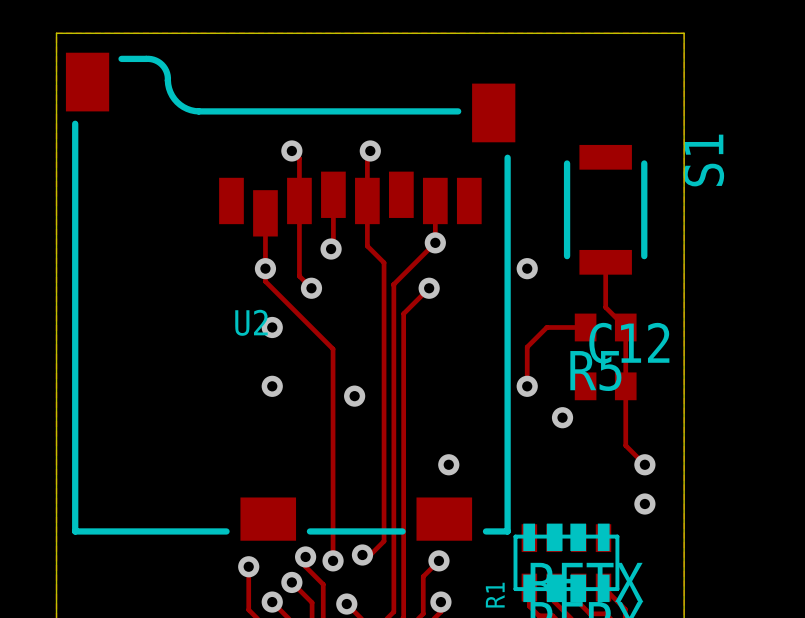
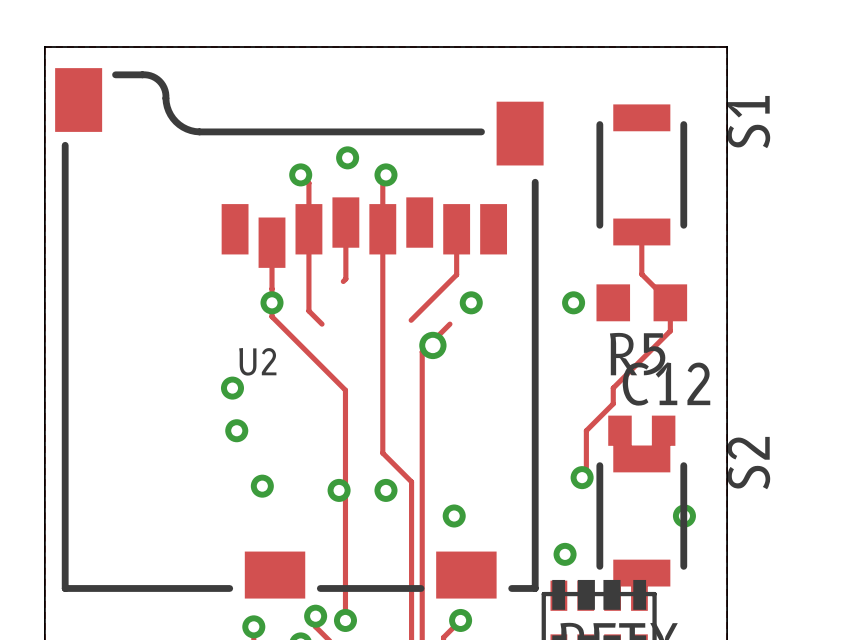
via: none -> (347, 157)
track: none -> (641, 231) (641, 274) (670, 302) (670, 331) (613, 388) (613, 403) (586, 430) (586, 473) (582, 477)
S1 position: (605, 209) -> (641, 174)
via: (435, 242) -> none
track: (367, 246) (384, 262) (384, 541) (370, 554) (362, 554) -> none
via: (331, 249) -> none
track: (605, 262) (605, 307) (625, 327) (625, 445) (644, 464) -> none
via: none -> (471, 302)
via position: (527, 268) -> (573, 302)
track: (393, 285) (393, 433) -> (382, 278) (382, 453) (411, 481)
via: (311, 288) -> none
via: (429, 288) -> none
via: none -> (432, 345)
R5 footprint: [574, 313, 637, 342] -> [596, 284, 688, 322]
via: (272, 327) -> none
track: (585, 327) (546, 327) (527, 347) (527, 386) -> none
via: none -> (232, 388)
via: none -> (236, 430)
via: (272, 386) -> none
via: (527, 386) -> none
via: (354, 396) -> none
via position: (562, 417) -> (582, 477)
via: none -> (262, 486)
via: none -> (339, 490)
via: none -> (385, 490)
via position: (448, 464) -> (454, 516)
S2: none -> (641, 516)
via: none -> (565, 554)
via: (644, 504) -> none
via: (362, 554) -> none

